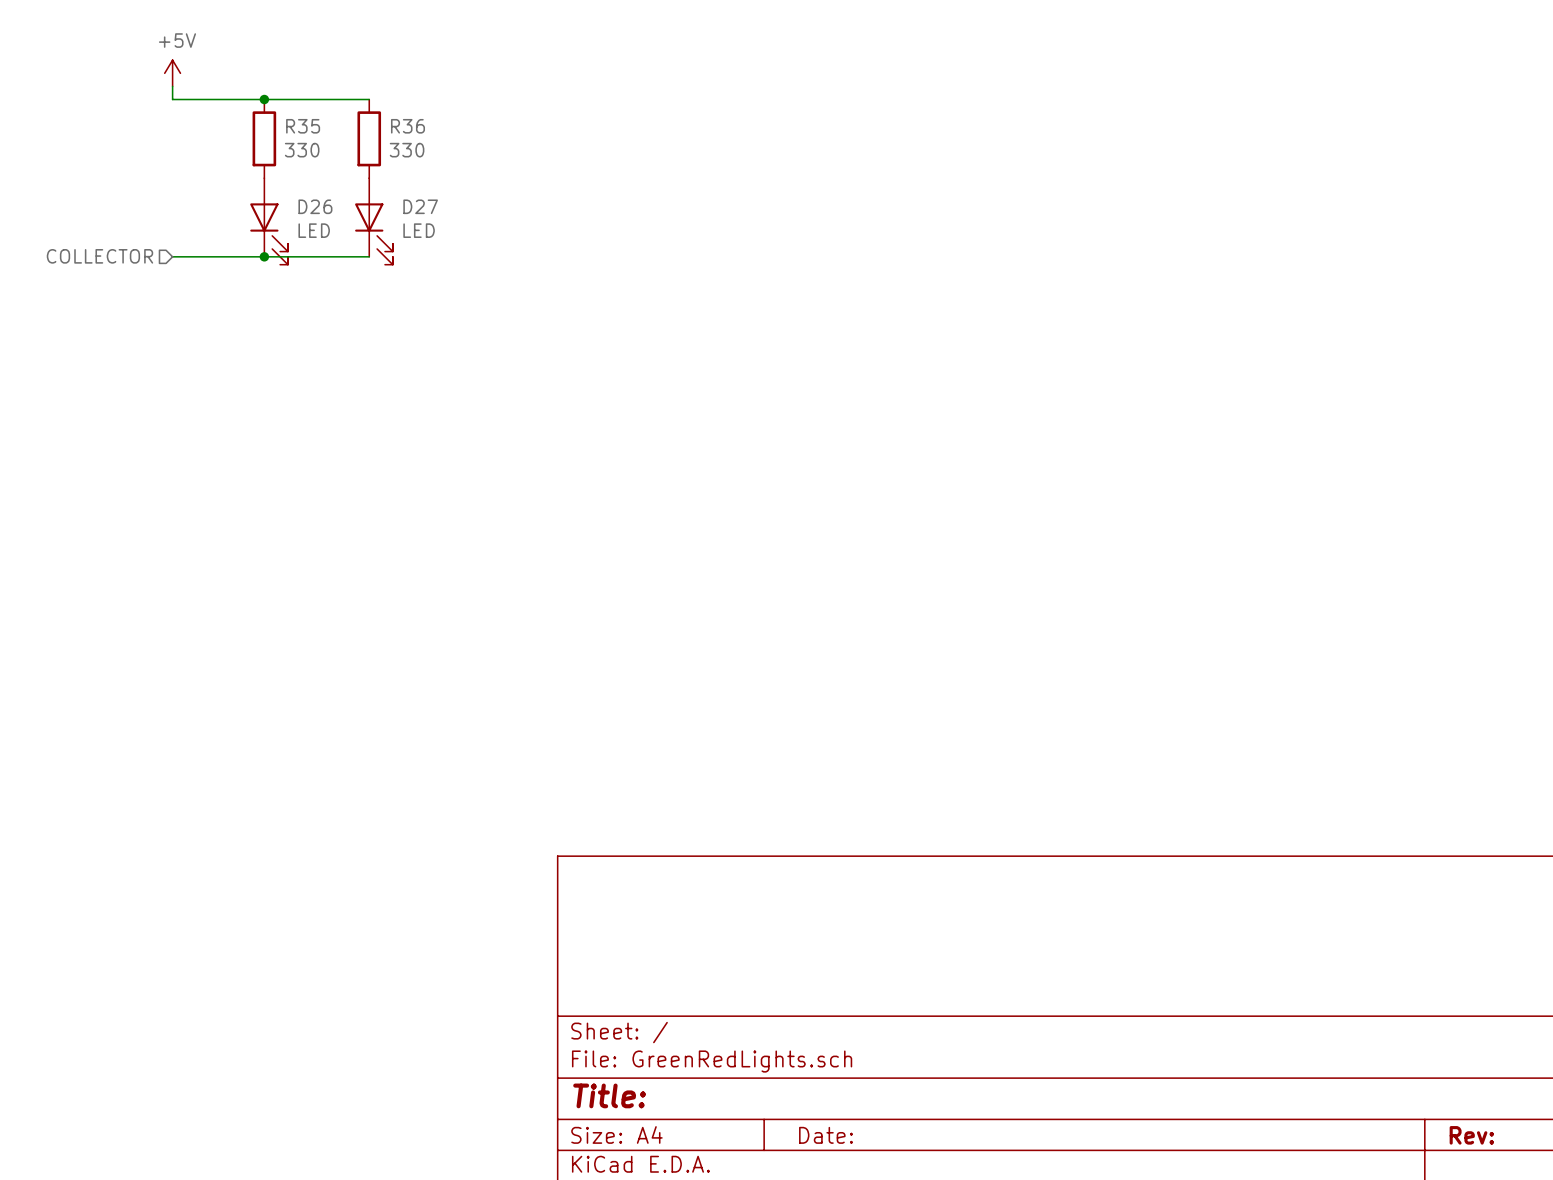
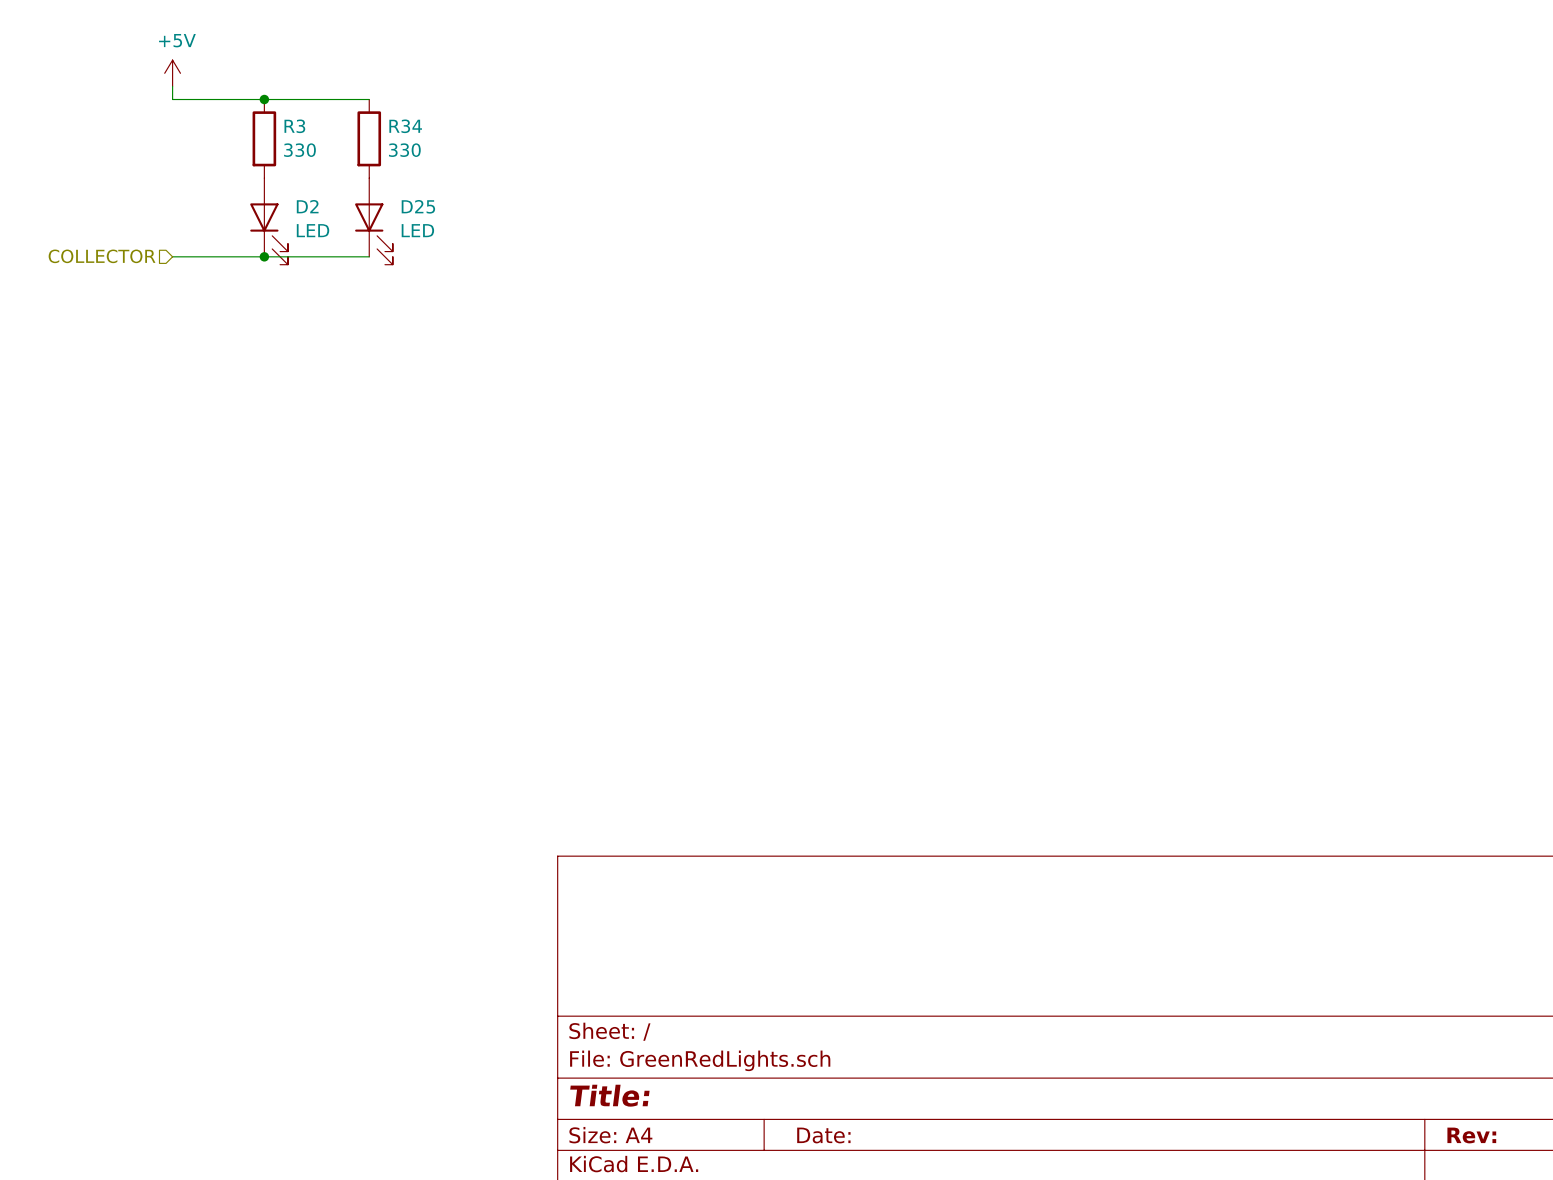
R35 name: R35 (303, 126) -> R3 (294, 126)
R36 name: R36 (407, 126) -> R34 (405, 126)
D26 name: D26 (315, 206) -> D2 (307, 206)
D27 name: D27 (420, 206) -> D25 (418, 206)

